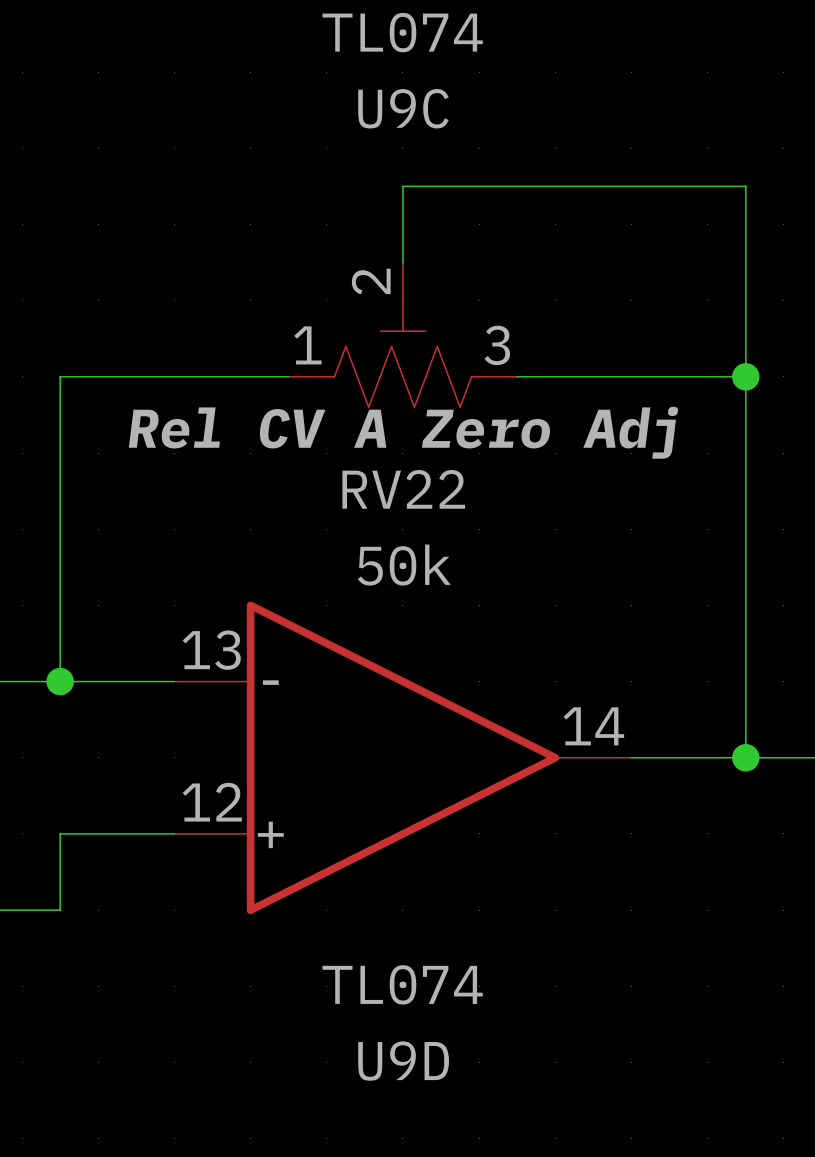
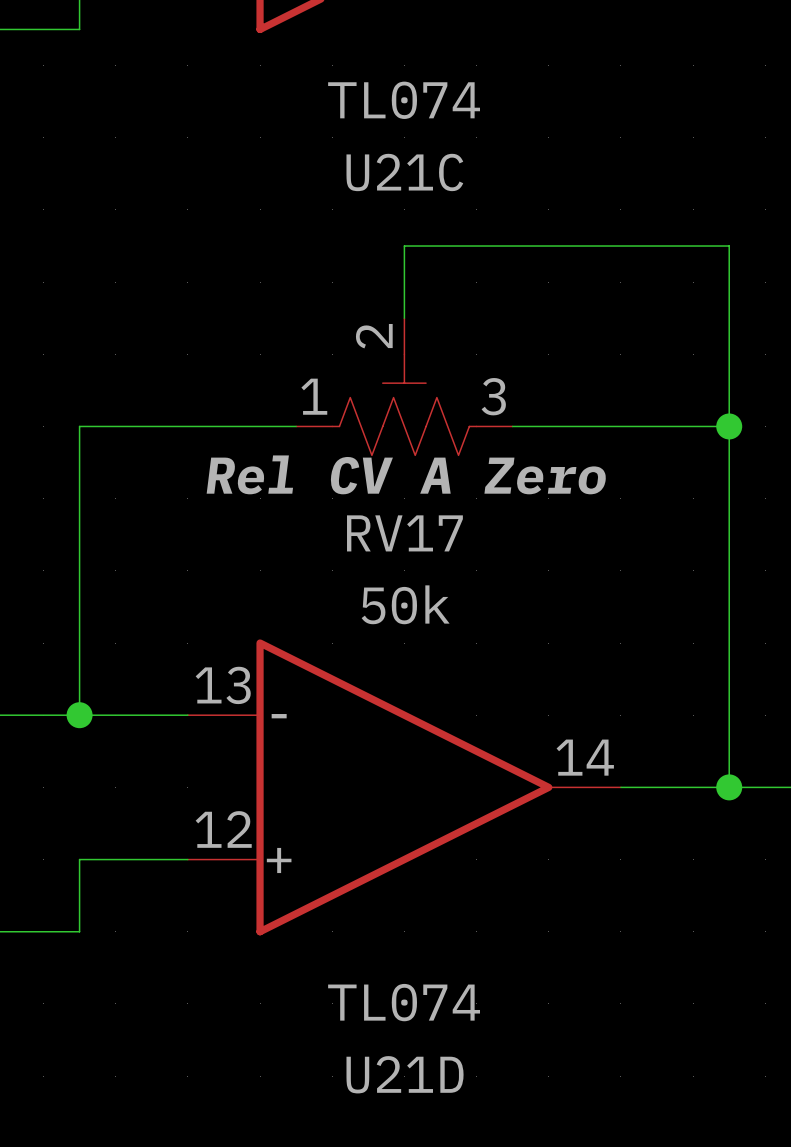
U9C name: U9C (403, 108) -> U21C (404, 172)
RV22 text: Rel CV A Zero Adj (403, 432) -> Rel CV A Zero (406, 474)
RV22 name: RV22 (403, 489) -> RV17 (404, 533)
U9D name: U9D (403, 1061) -> U21D (405, 1074)

